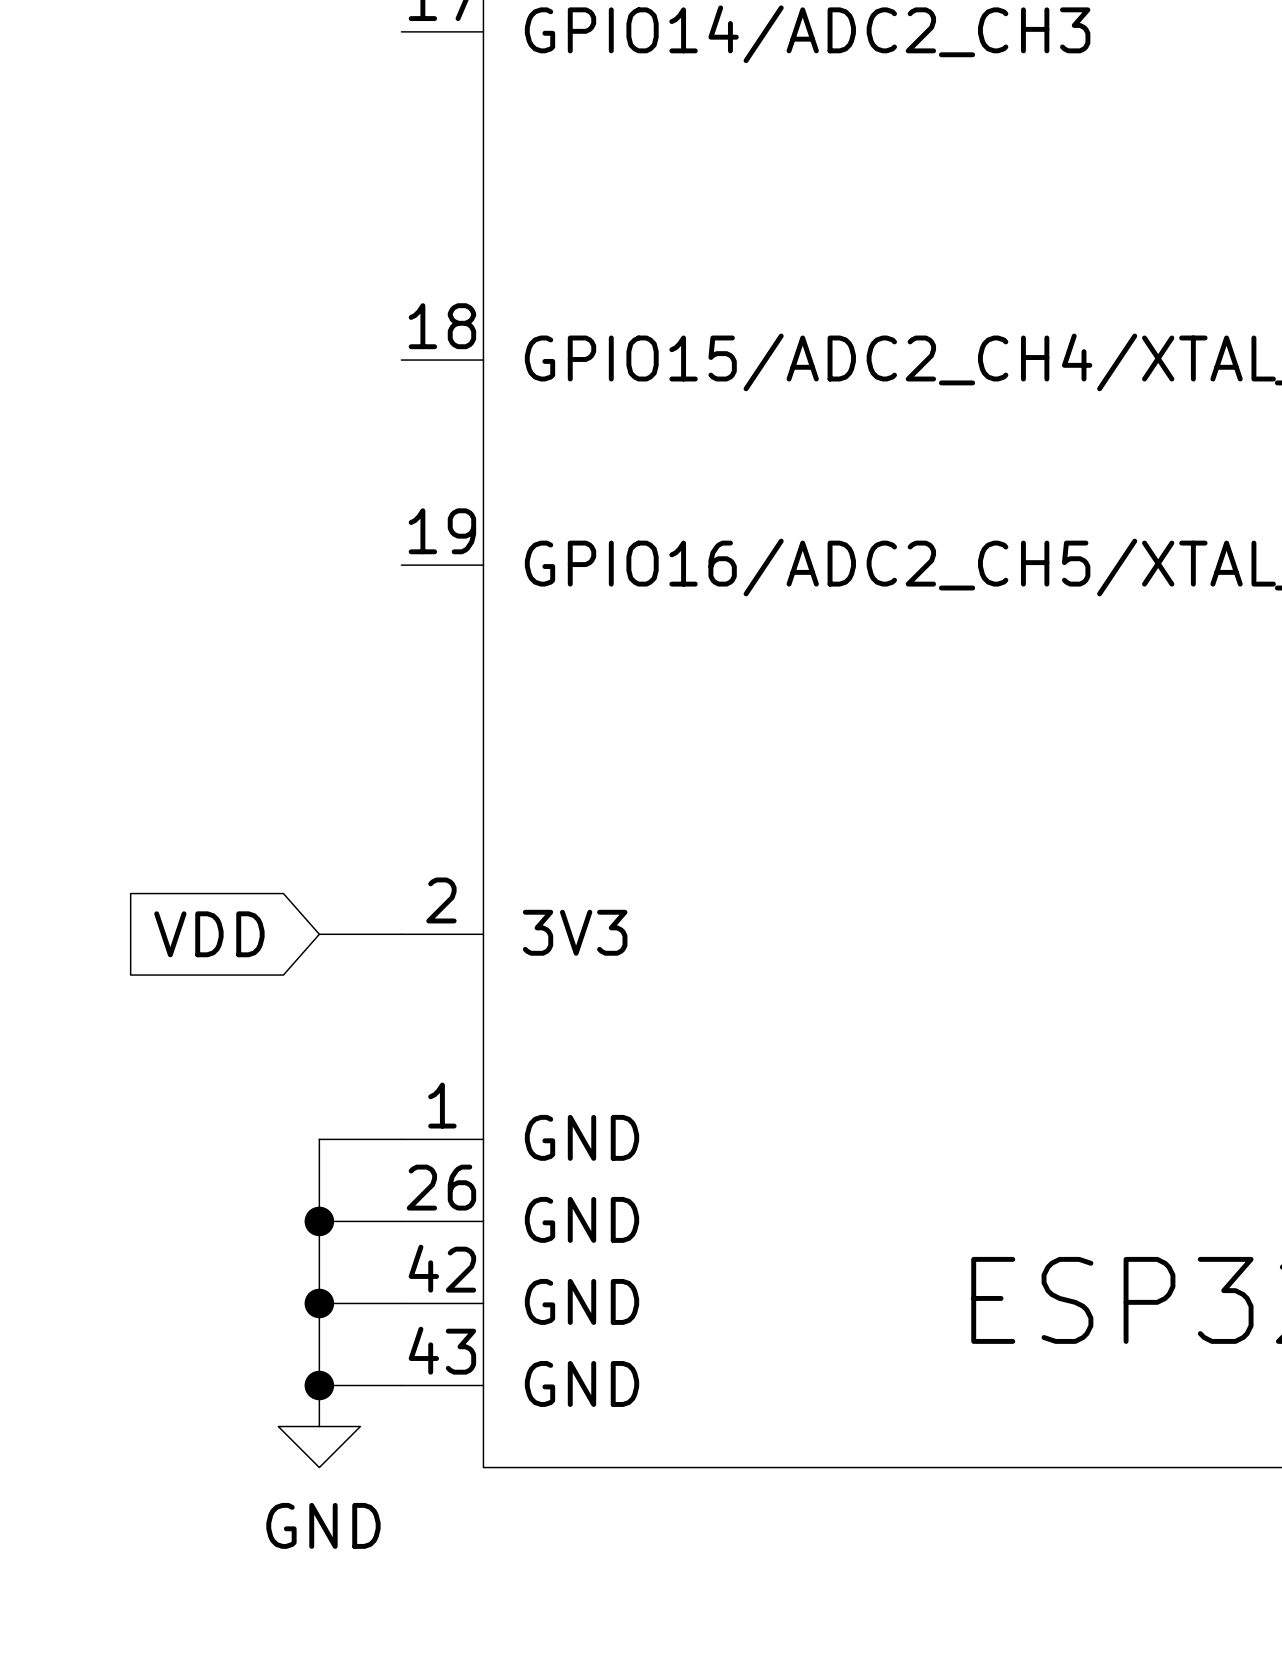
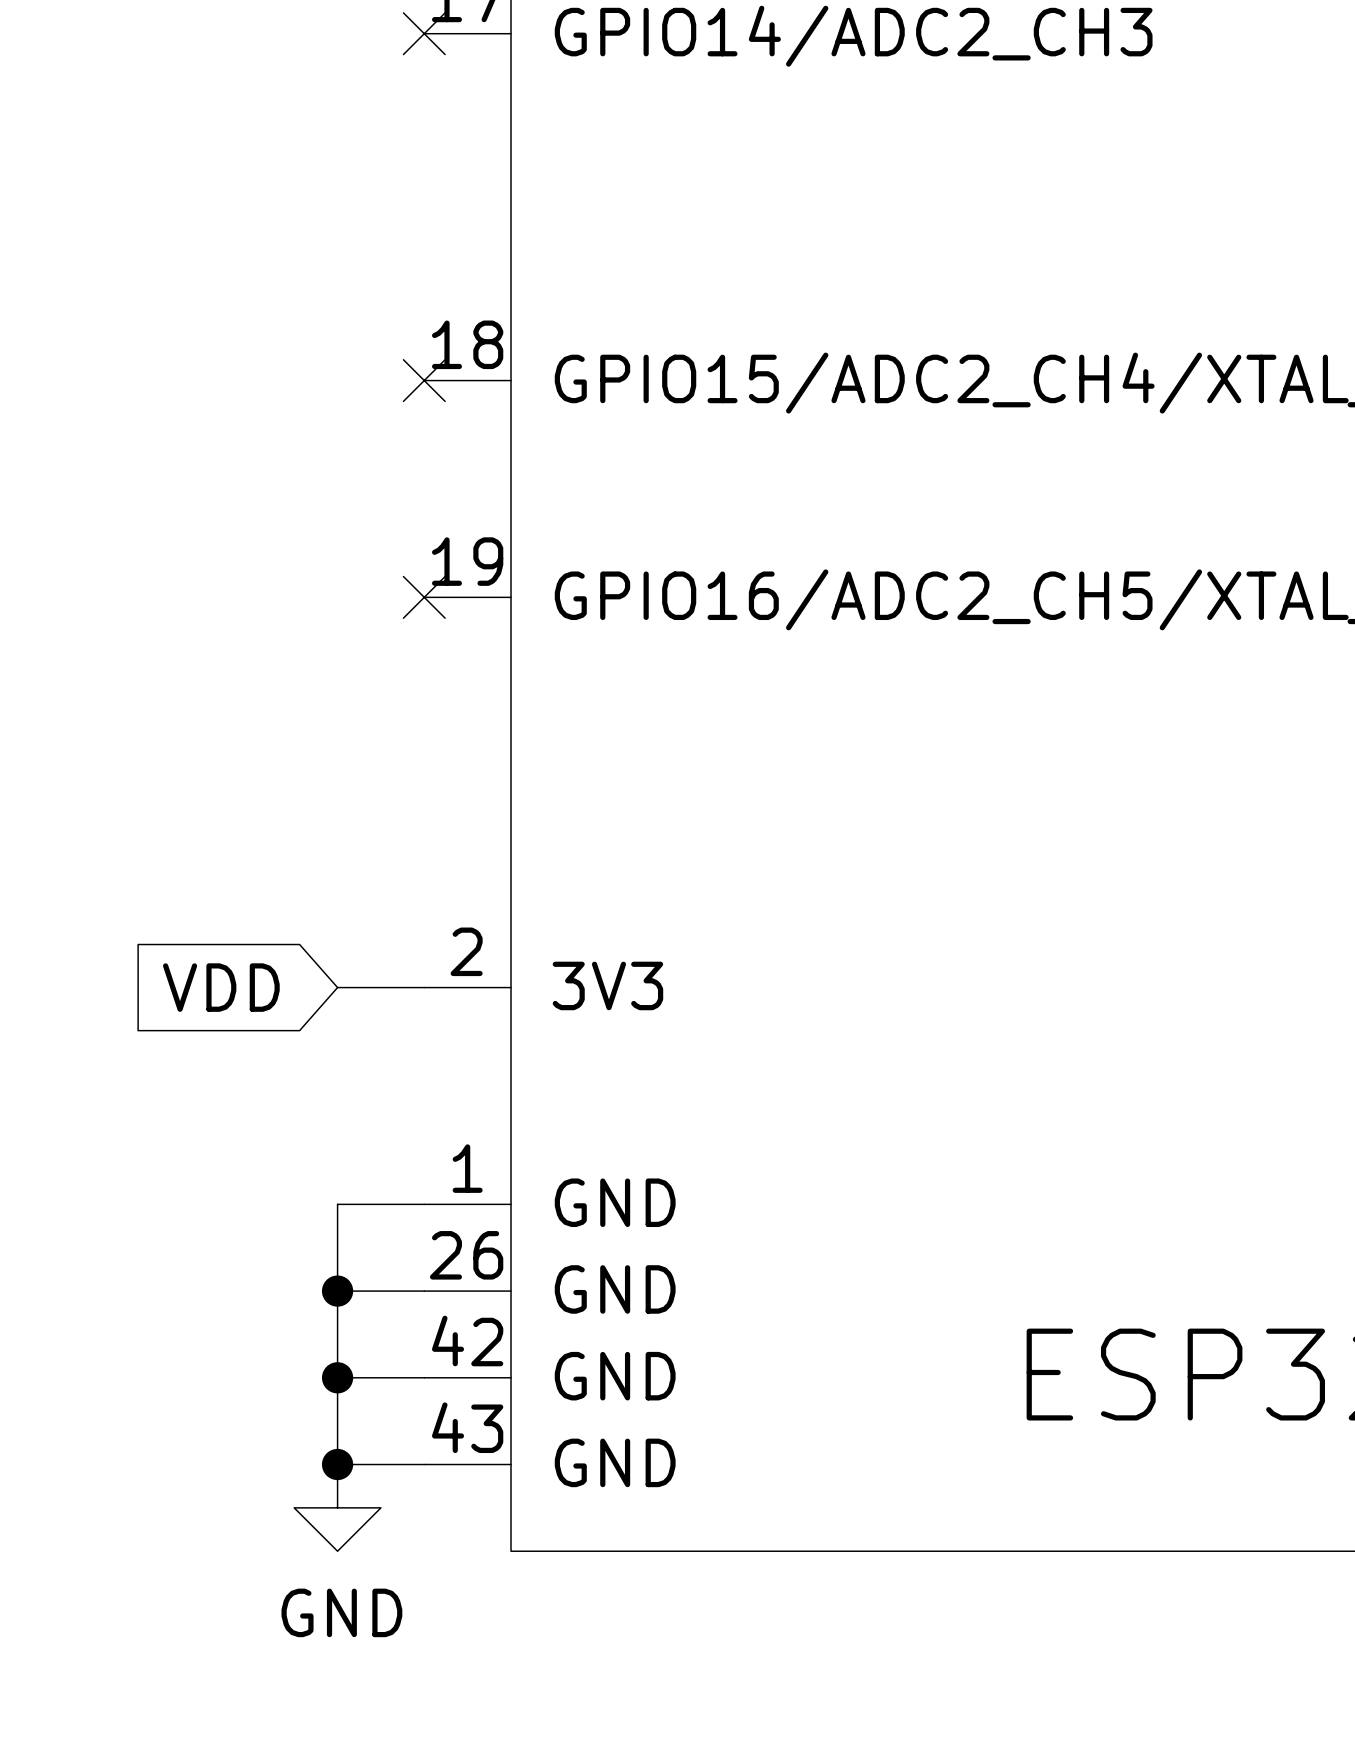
no-connect mark: none -> (424, 33)
no-connect mark: none -> (424, 380)
no-connect mark: none -> (424, 597)

